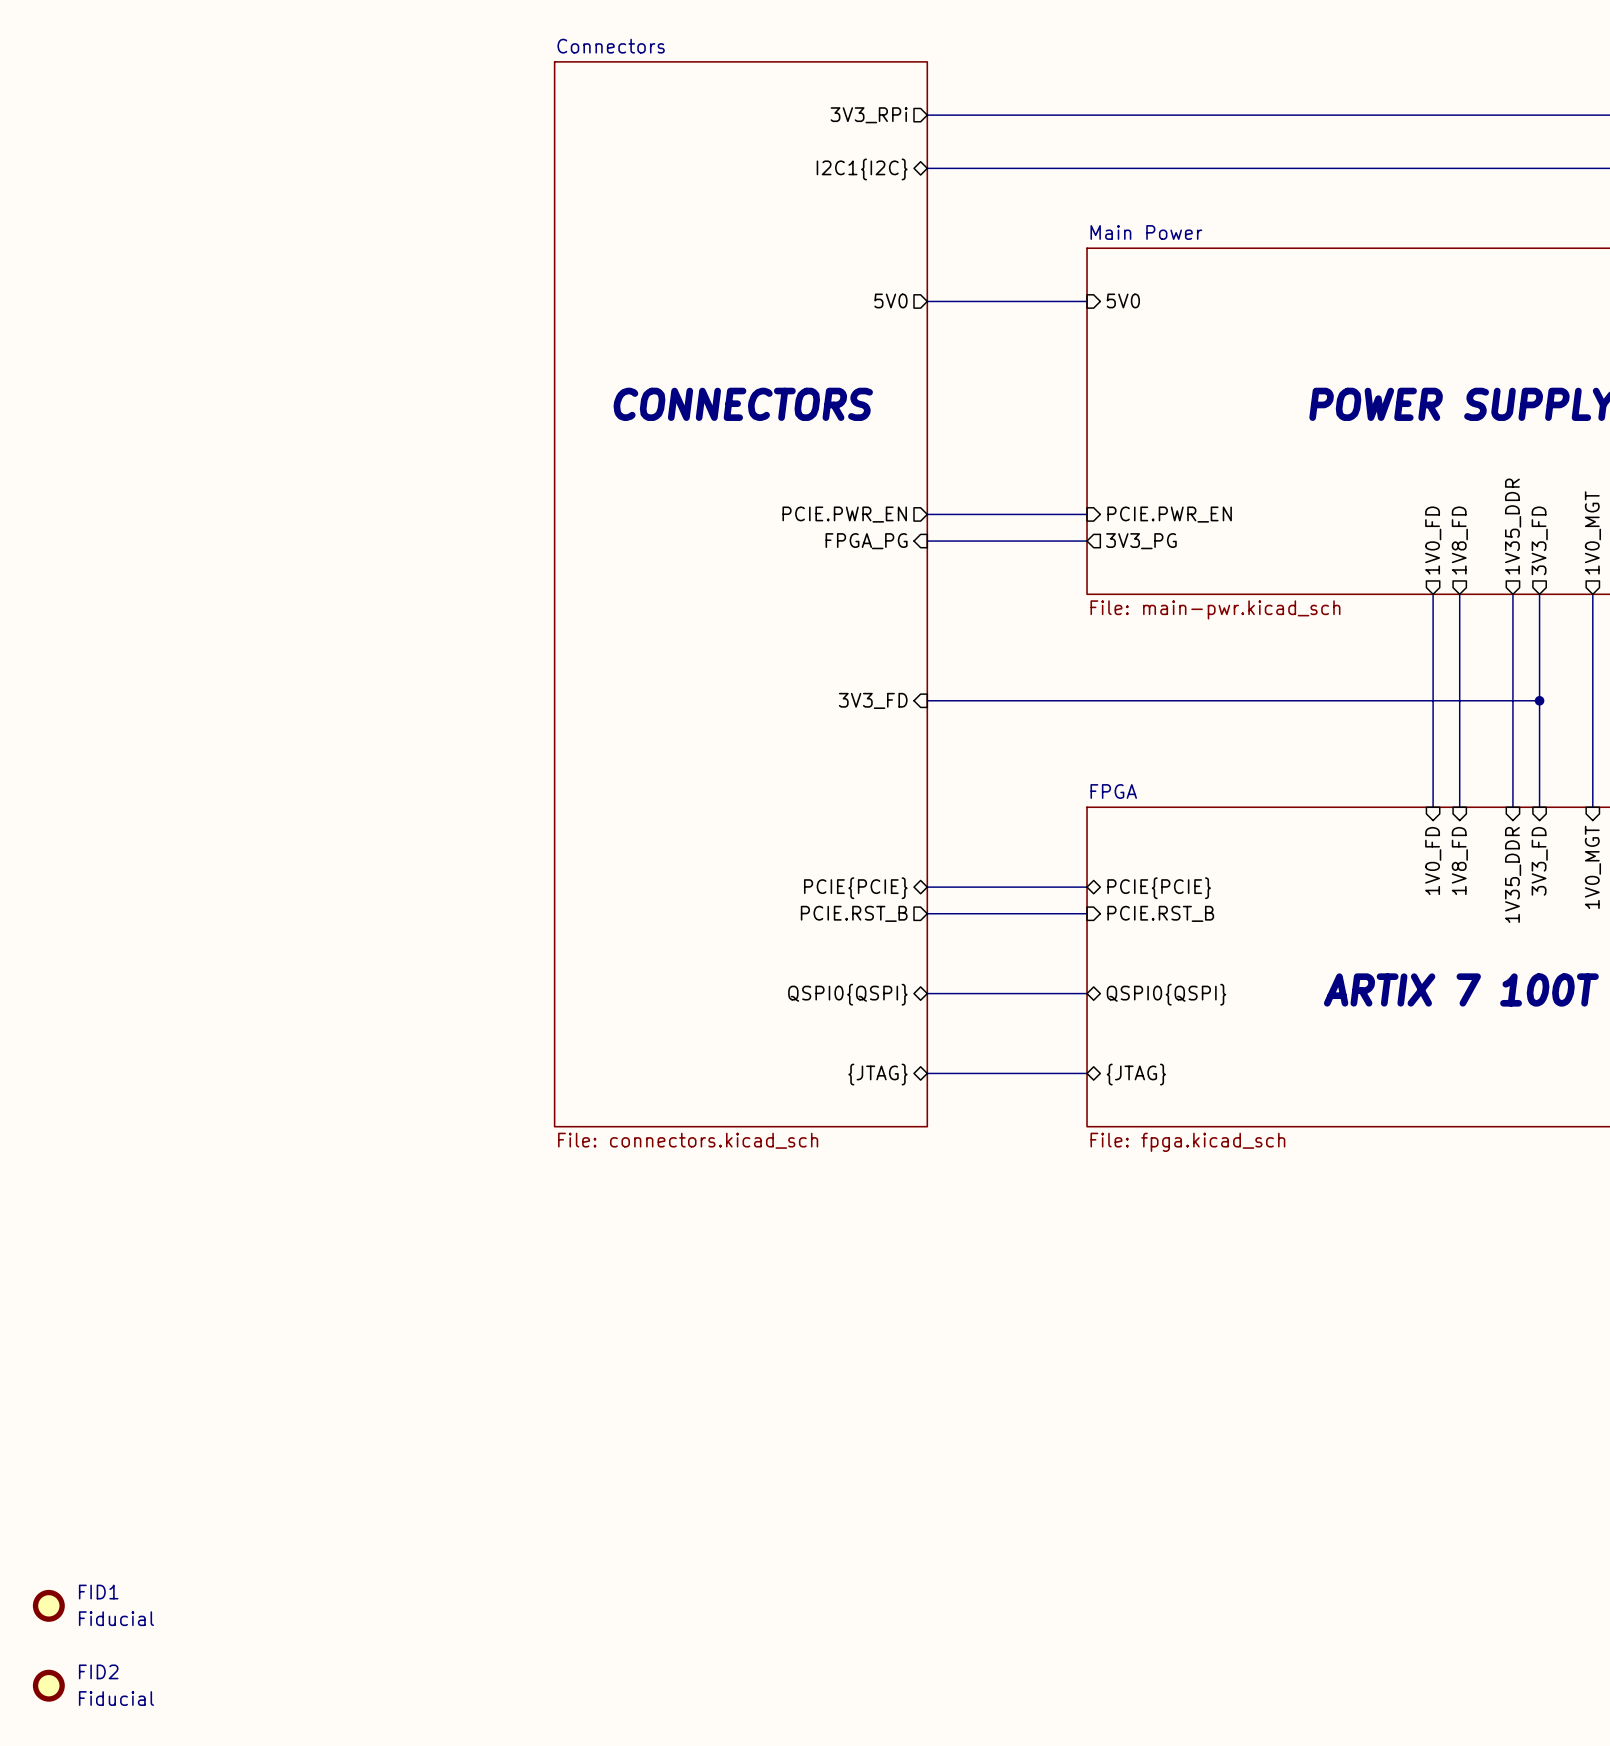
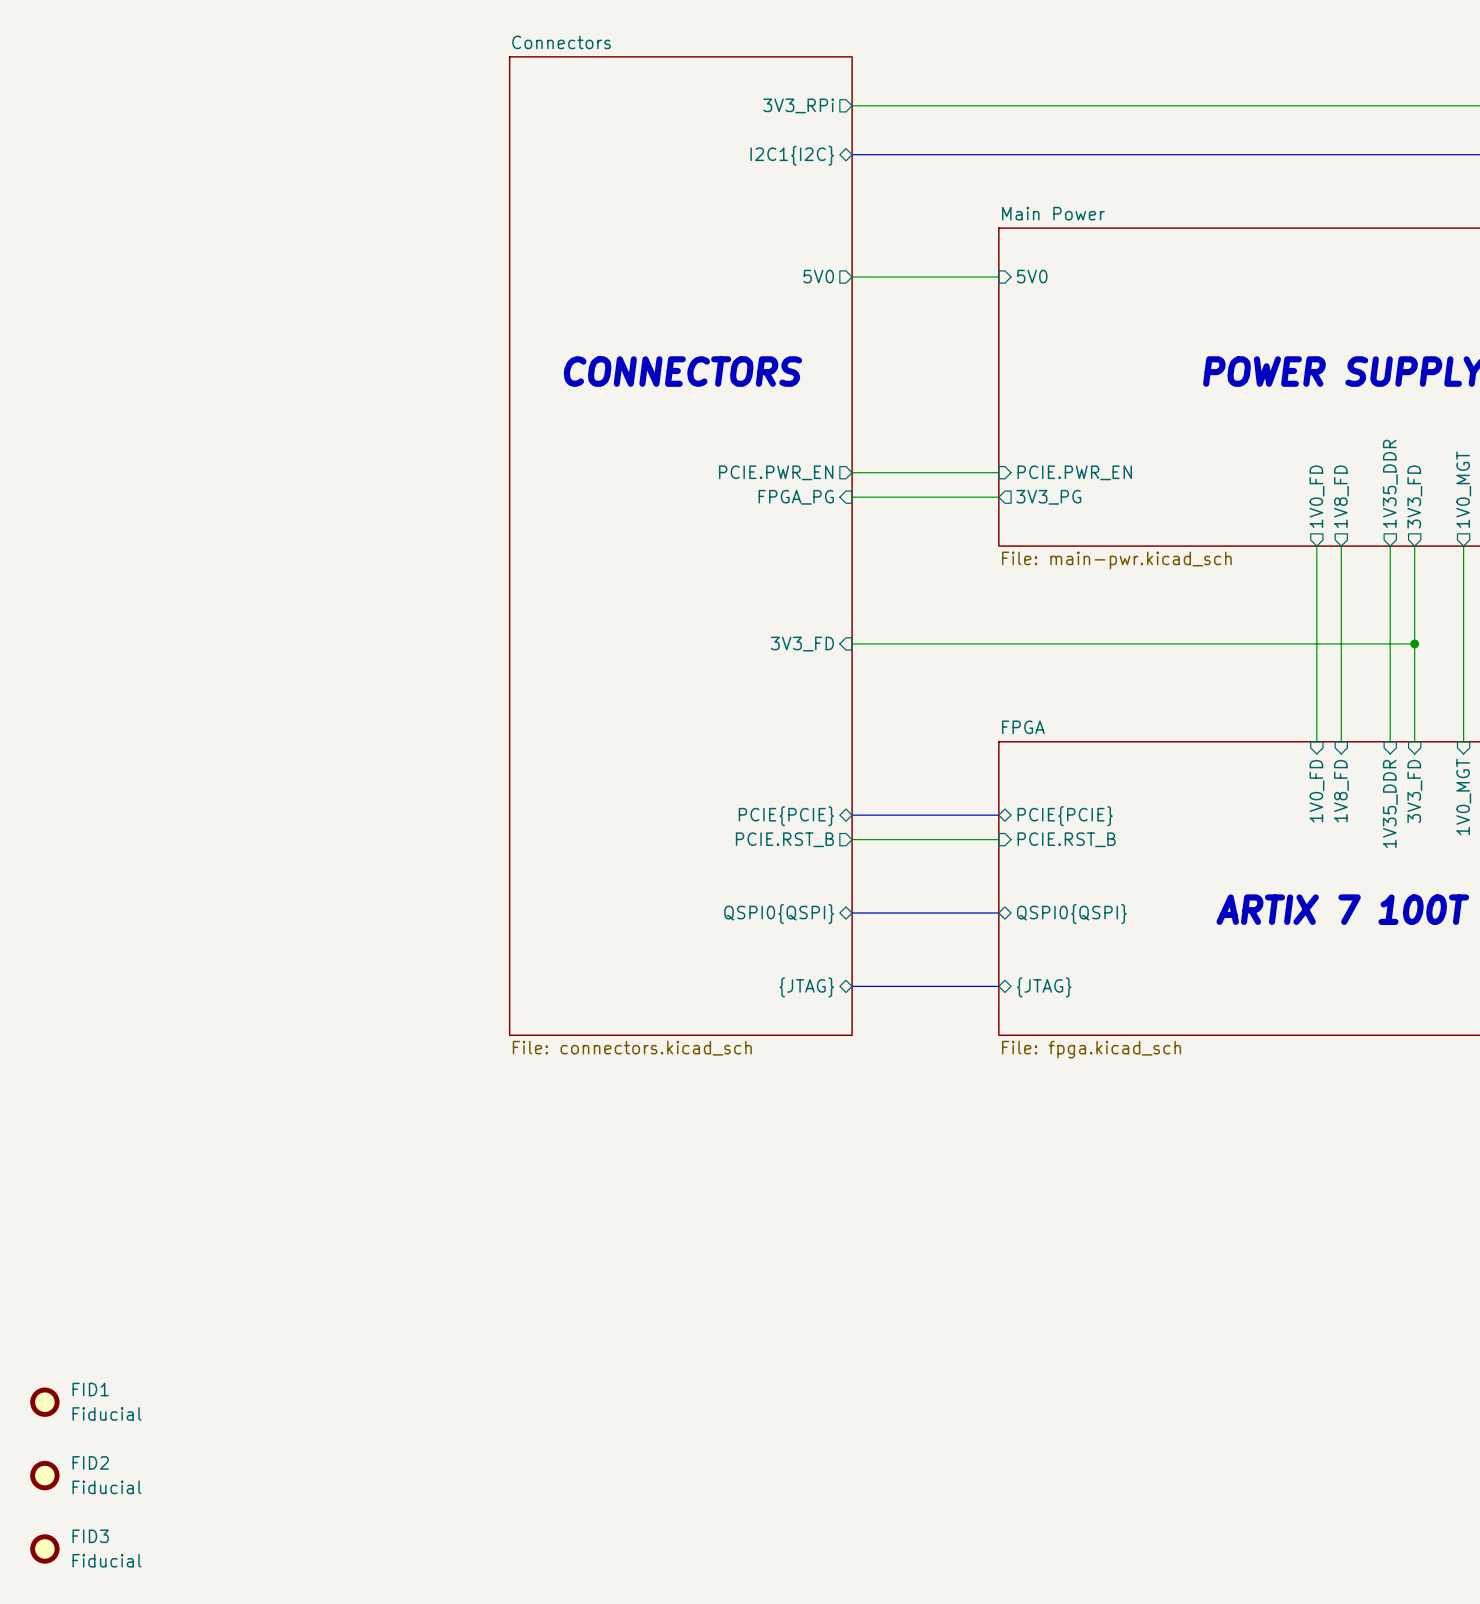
FID1: none -> Fiducial (44, 1402)
FID1 name: FID1 (98, 1592) -> FID2 (90, 1462)
FID2 name: FID2 (98, 1671) -> FID3 (90, 1536)

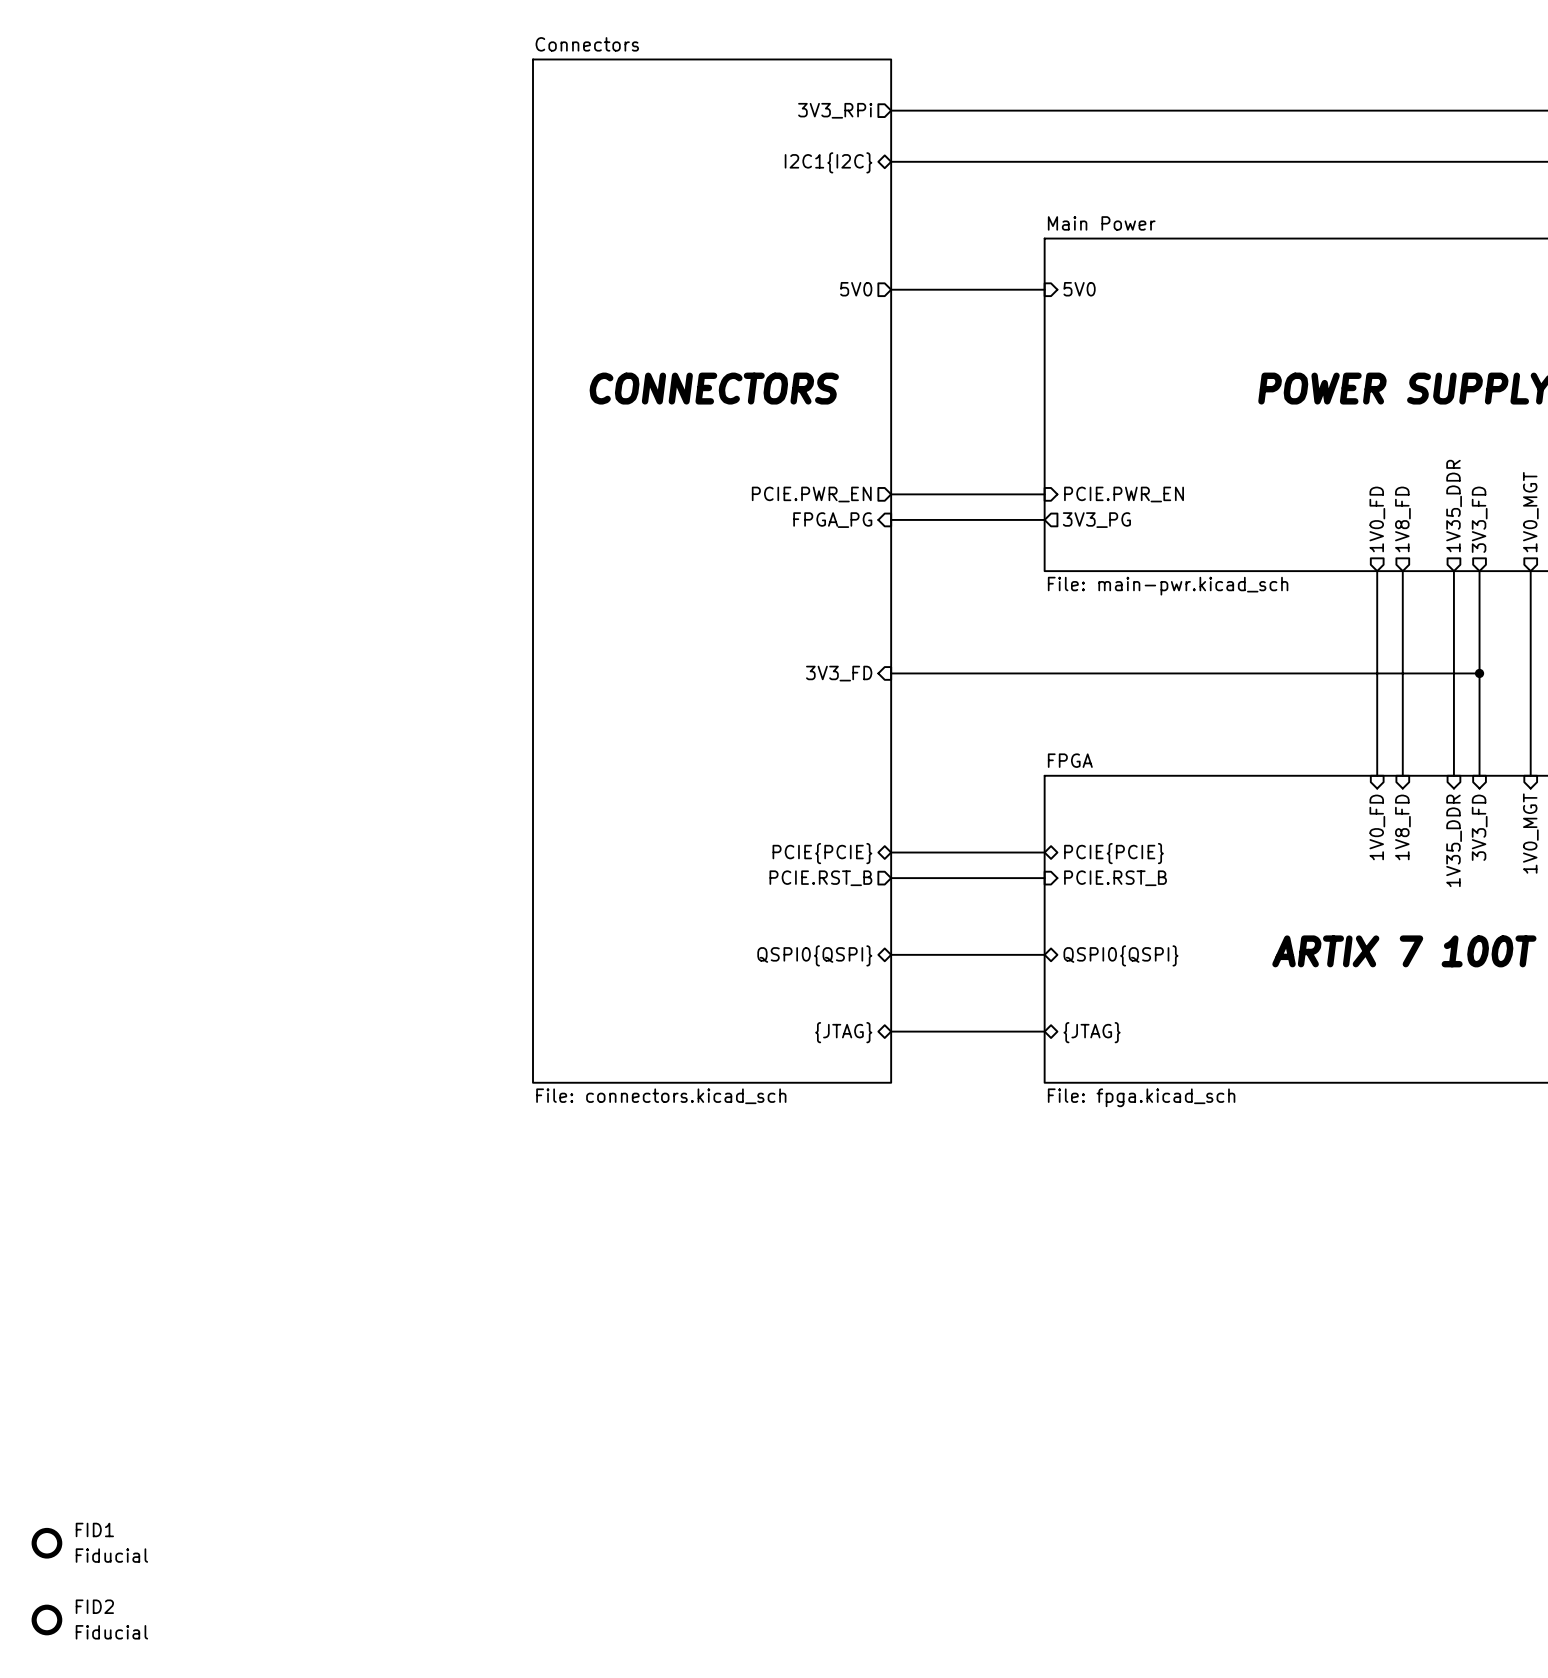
FID1: Fiducial (44, 1402) -> none
FID2 name: FID2 (90, 1462) -> FID1 (94, 1529)
FID3 name: FID3 (90, 1536) -> FID2 (94, 1606)

